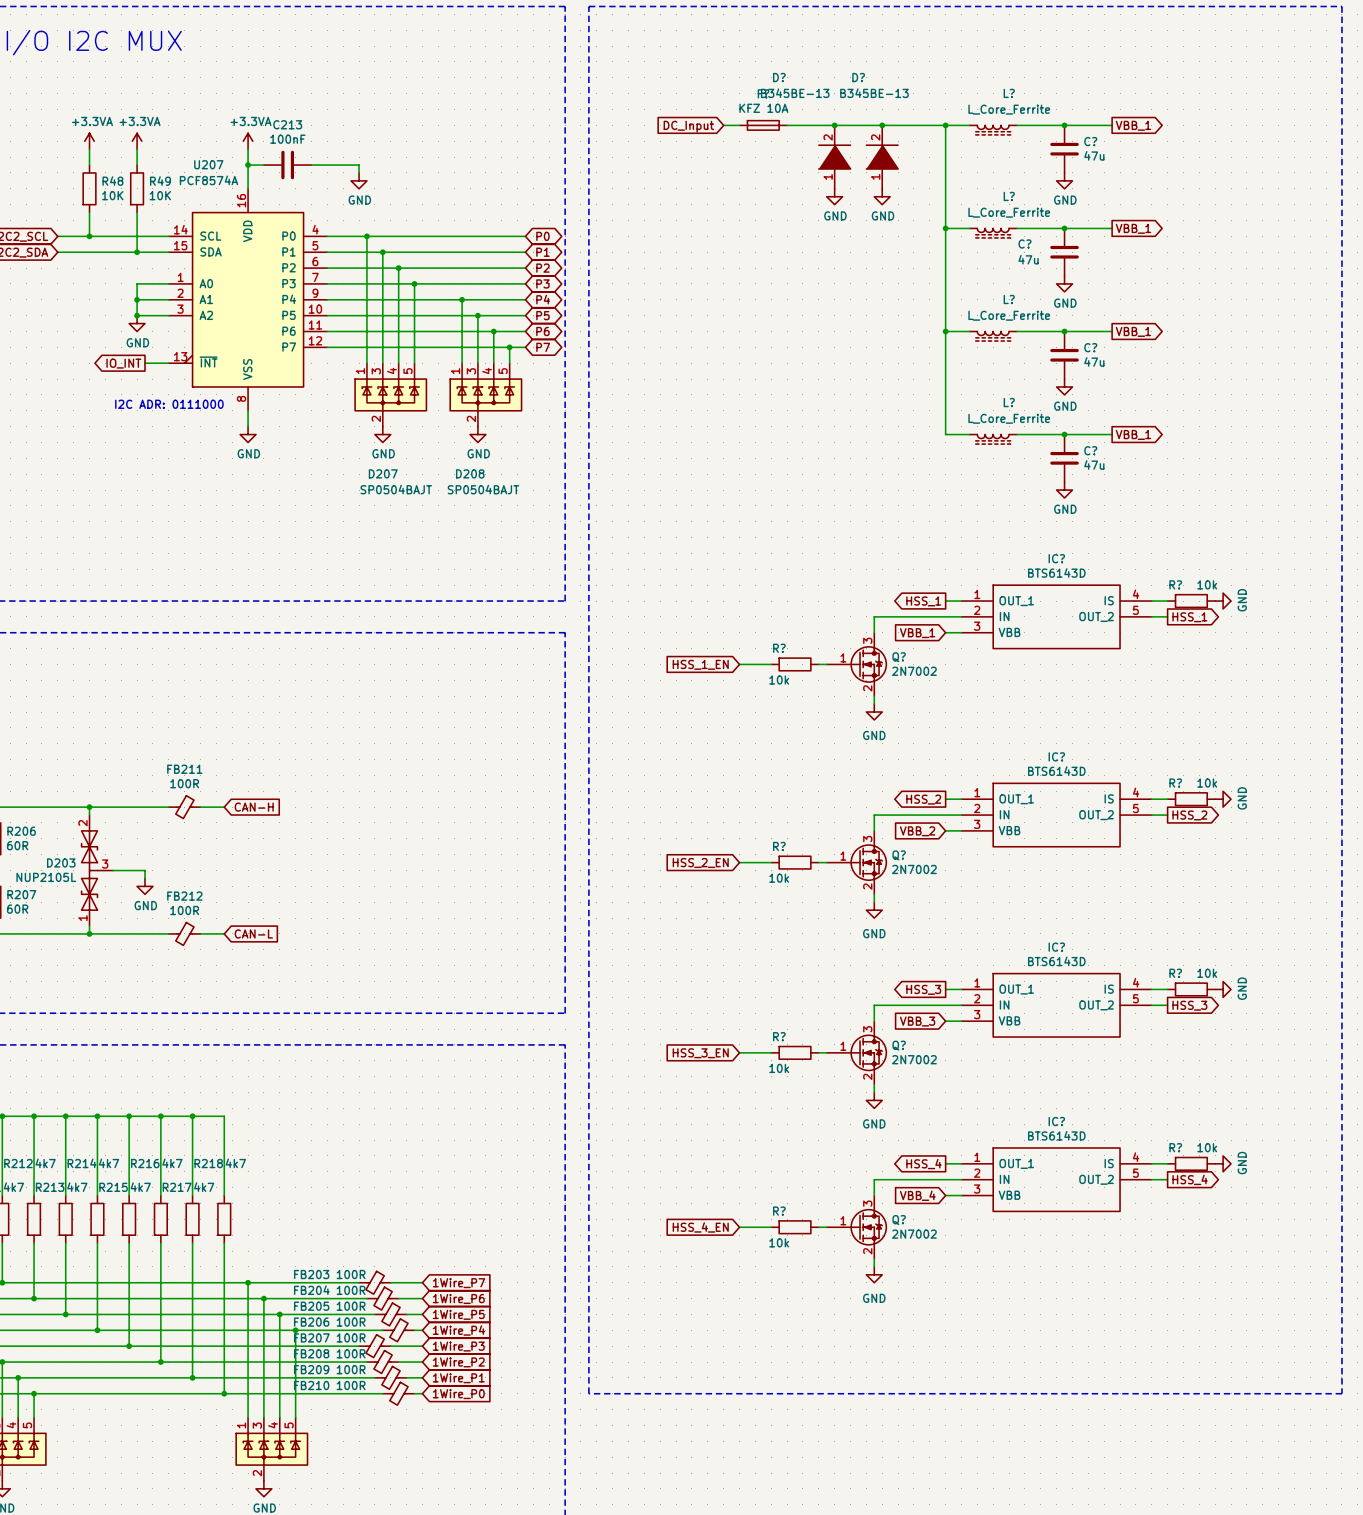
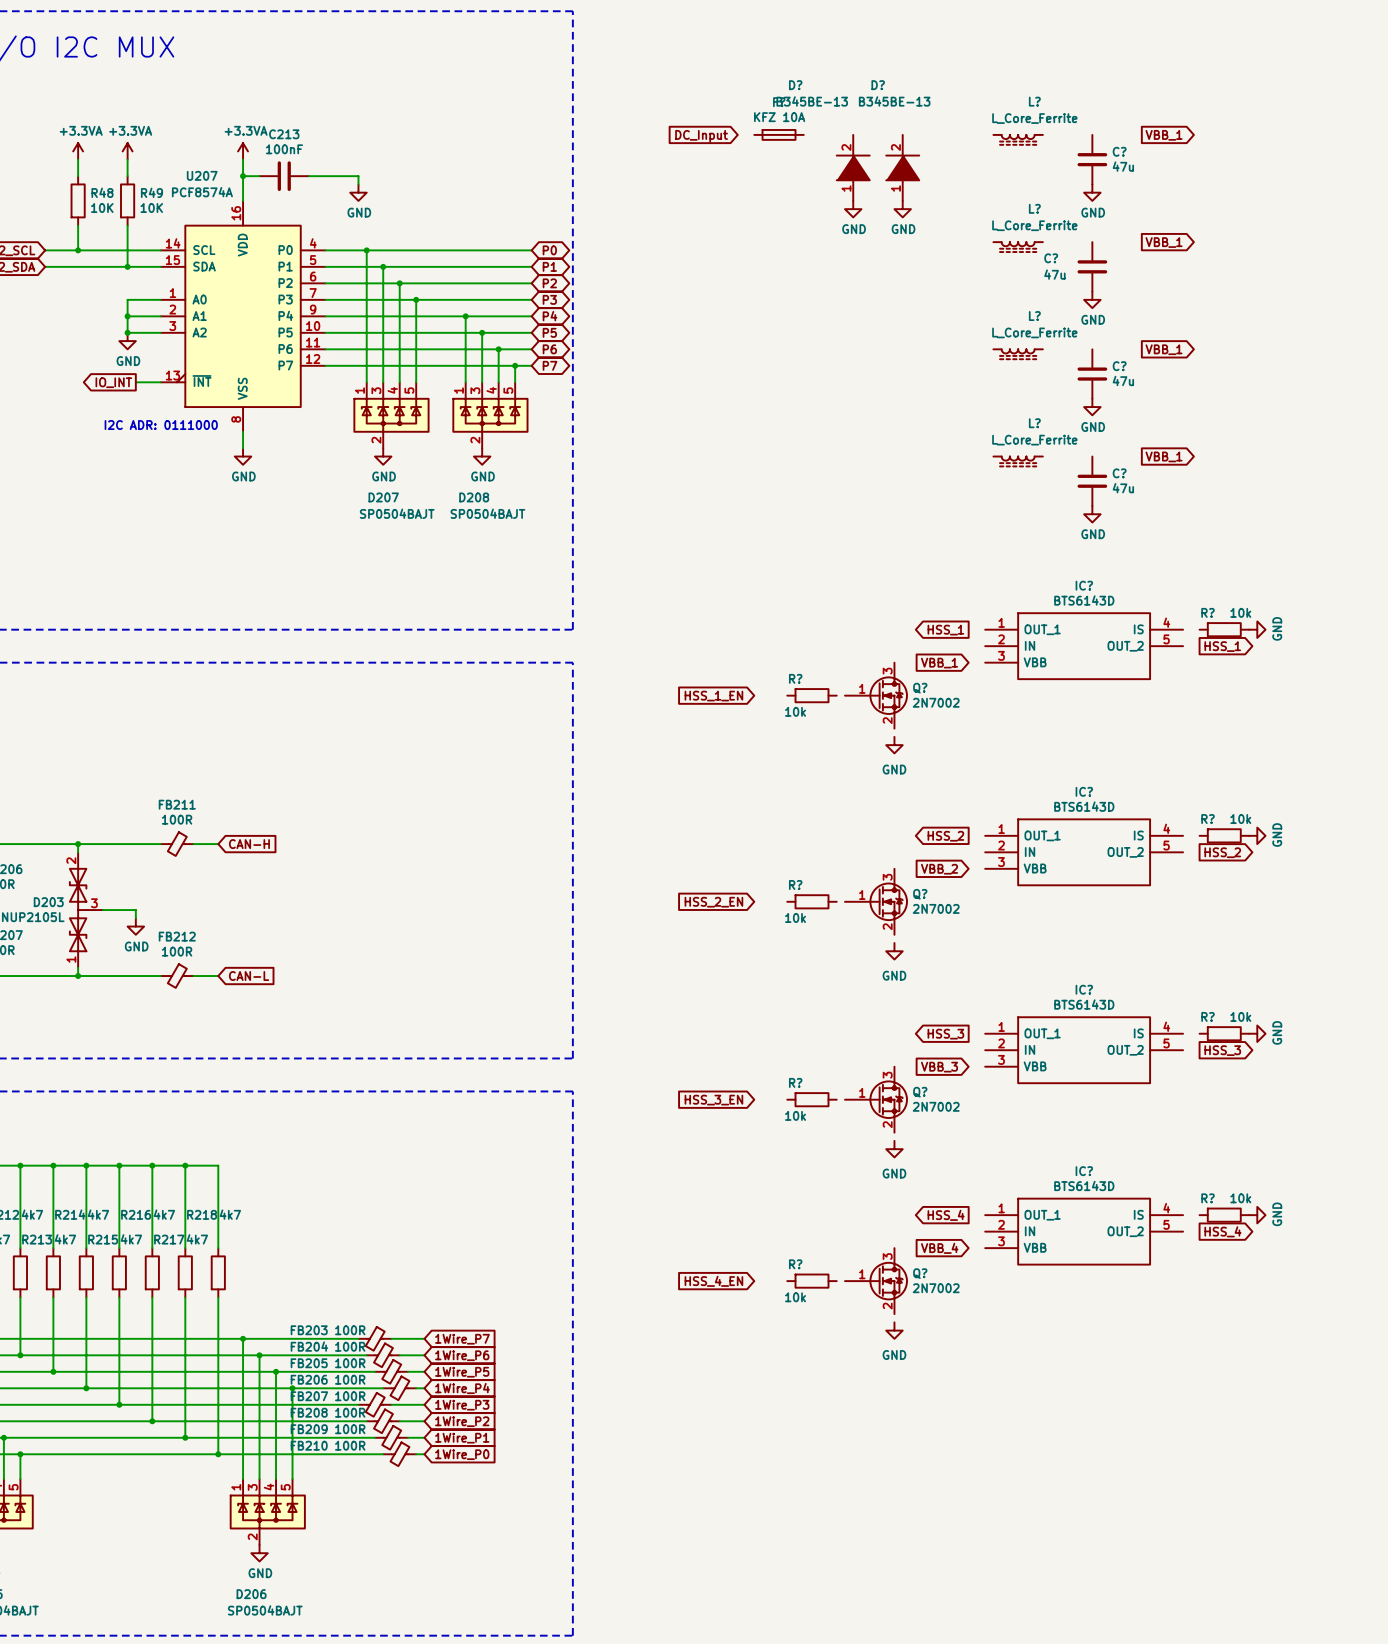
line: (588, 6) (1341, 6) (1341, 1393) (588, 1393) (588, 6) -> none
wire: (723, 125) (739, 125) -> none
wire: (787, 125) (969, 125) -> none
junction: (834, 125) -> none
junction: (882, 125) -> none
wire: (945, 125) (945, 434) (969, 434) -> none
junction: (945, 125) -> none
wire: (1016, 125) (1112, 125) -> none
junction: (1064, 125) -> none
wire: (945, 228) (969, 228) -> none
junction: (945, 228) -> none
wire: (1016, 228) (1112, 228) -> none
junction: (1064, 228) -> none
wire: (945, 331) (969, 331) -> none
junction: (945, 331) -> none
wire: (1016, 331) (1112, 331) -> none
junction: (1064, 331) -> none
wire: (1016, 434) (1112, 434) -> none
junction: (1064, 434) -> none
wire: (945, 601) (961, 601) -> none
wire: (1151, 601) (1167, 601) -> none
wire: (961, 616) (874, 616) (874, 632) -> none
wire: (1151, 616) (1167, 616) -> none
wire: (945, 632) (961, 632) -> none
wire: (739, 664) (771, 664) -> none
wire: (818, 664) (826, 664) -> none
wire: (874, 696) (874, 704) -> none
wire: (945, 799) (961, 799) -> none
wire: (1151, 799) (1167, 799) -> none
wire: (961, 815) (874, 815) (874, 830) -> none
wire: (1151, 815) (1167, 815) -> none
wire: (945, 830) (961, 830) -> none
wire: (739, 862) (771, 862) -> none
wire: (818, 862) (826, 862) -> none
wire: (874, 894) (874, 902) -> none
wire: (945, 989) (961, 989) -> none
wire: (1151, 989) (1167, 989) -> none
wire: (961, 1005) (874, 1005) (874, 1021) -> none
wire: (1151, 1005) (1167, 1005) -> none
wire: (945, 1021) (961, 1021) -> none
wire: (739, 1052) (771, 1052) -> none
wire: (818, 1052) (826, 1052) -> none
wire: (874, 1084) (874, 1092) -> none
wire: (945, 1163) (961, 1163) -> none
wire: (1151, 1163) (1167, 1163) -> none
wire: (961, 1179) (874, 1179) (874, 1195) -> none
wire: (1151, 1179) (1167, 1179) -> none
wire: (945, 1195) (961, 1195) -> none
wire: (739, 1227) (771, 1227) -> none
wire: (818, 1227) (826, 1227) -> none
wire: (874, 1258) (874, 1266) -> none

